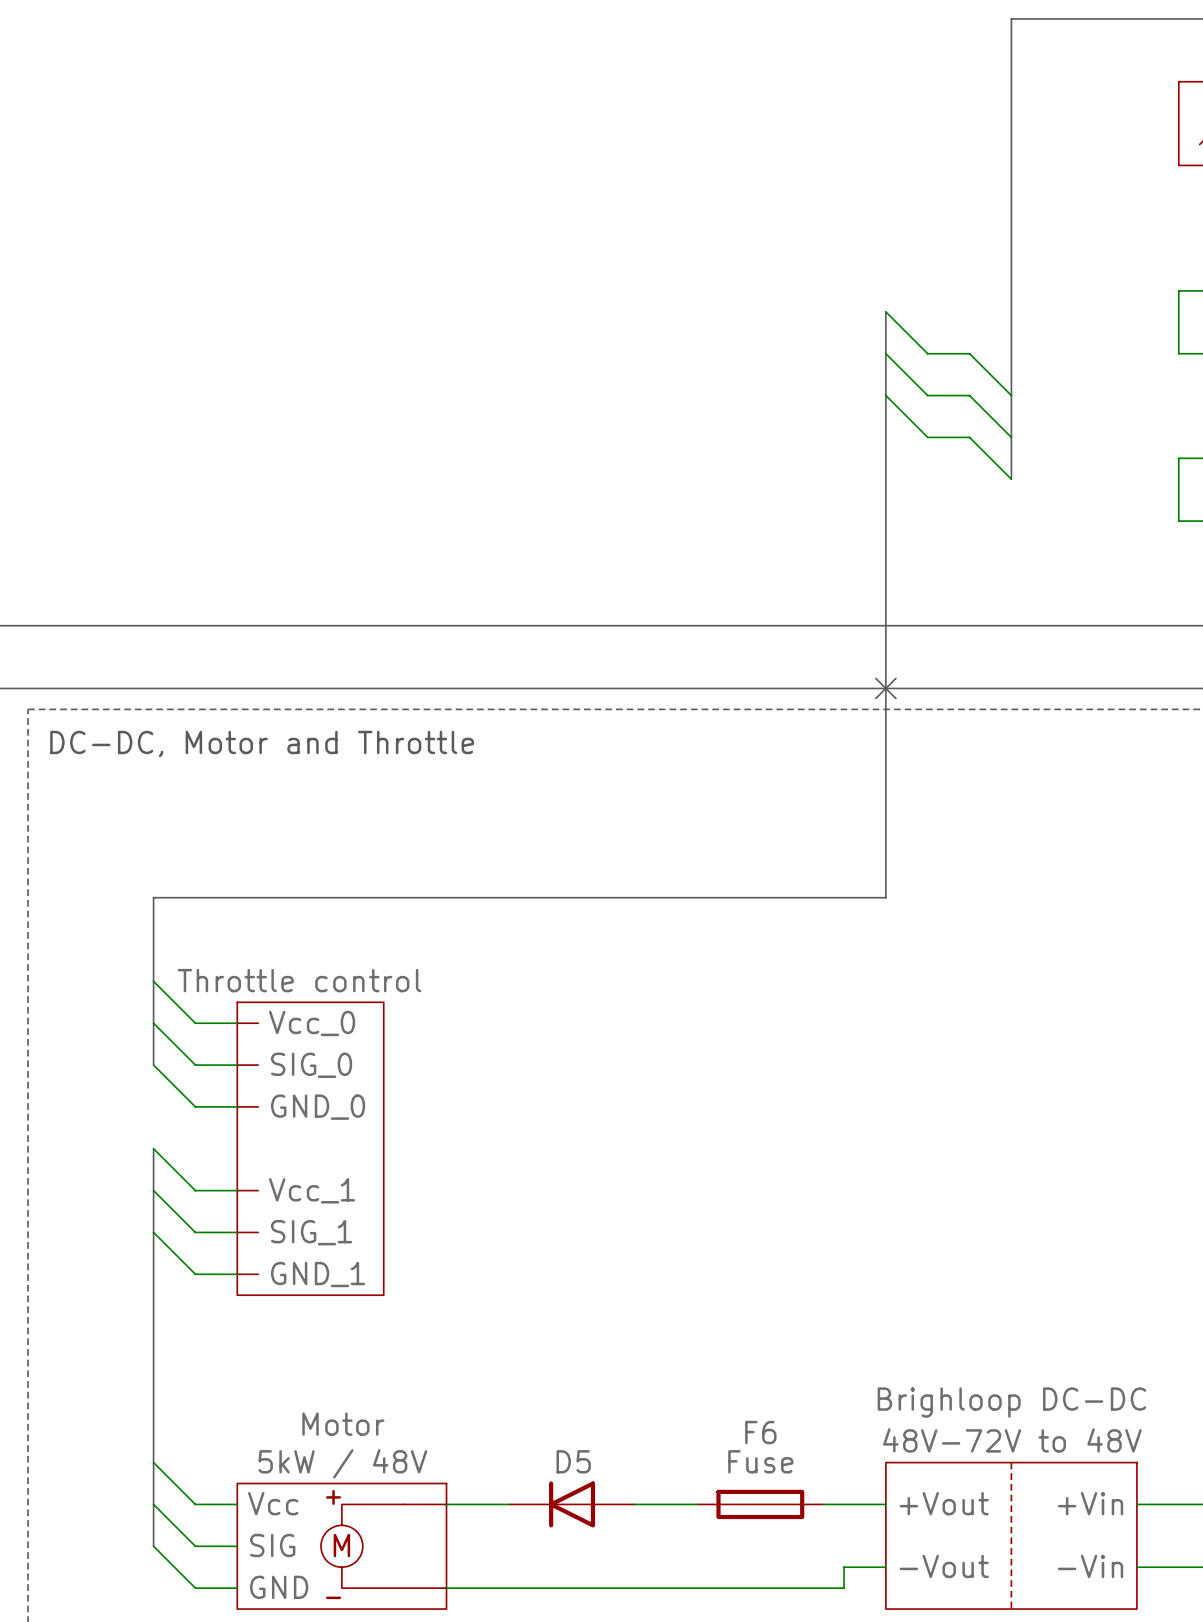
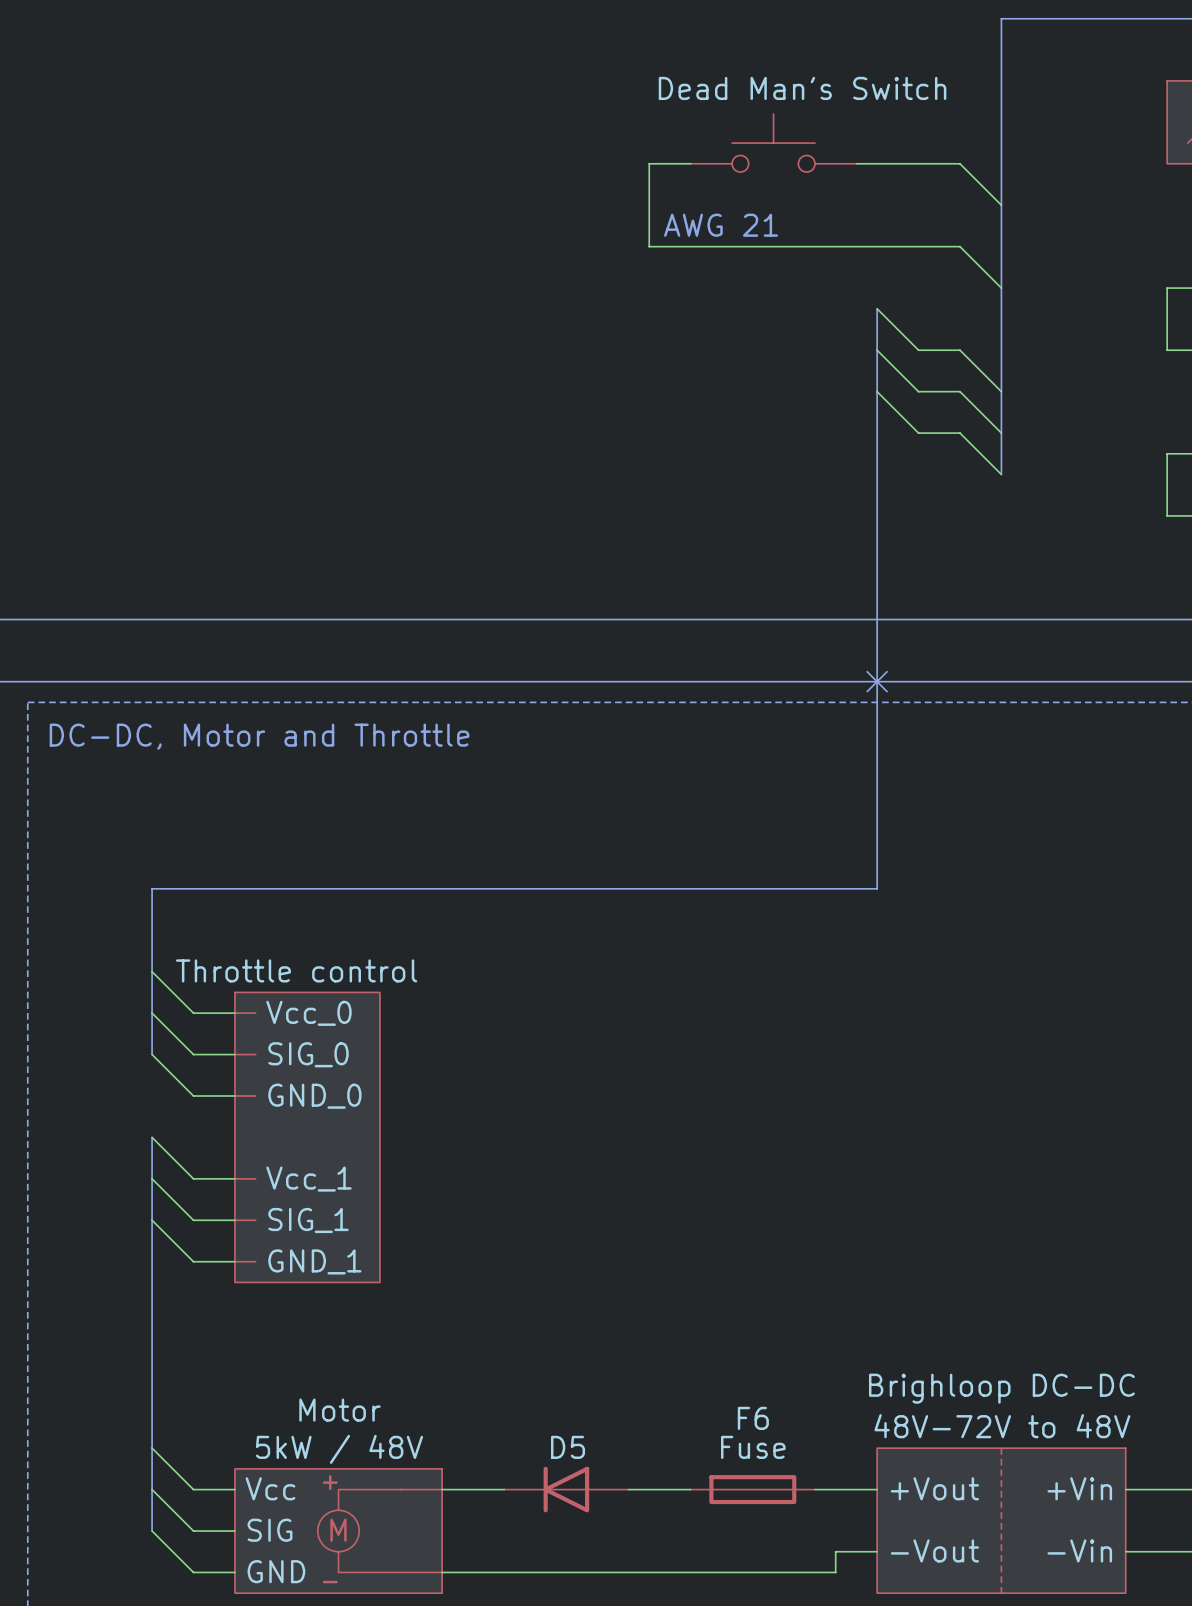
part: none -> (773, 143)
wire: none -> (690, 163) (649, 163) (649, 246) (959, 246) (1001, 288)
wire: none -> (856, 163) (959, 163) (1001, 205)
text: none -> AWG 21 (721, 225)

